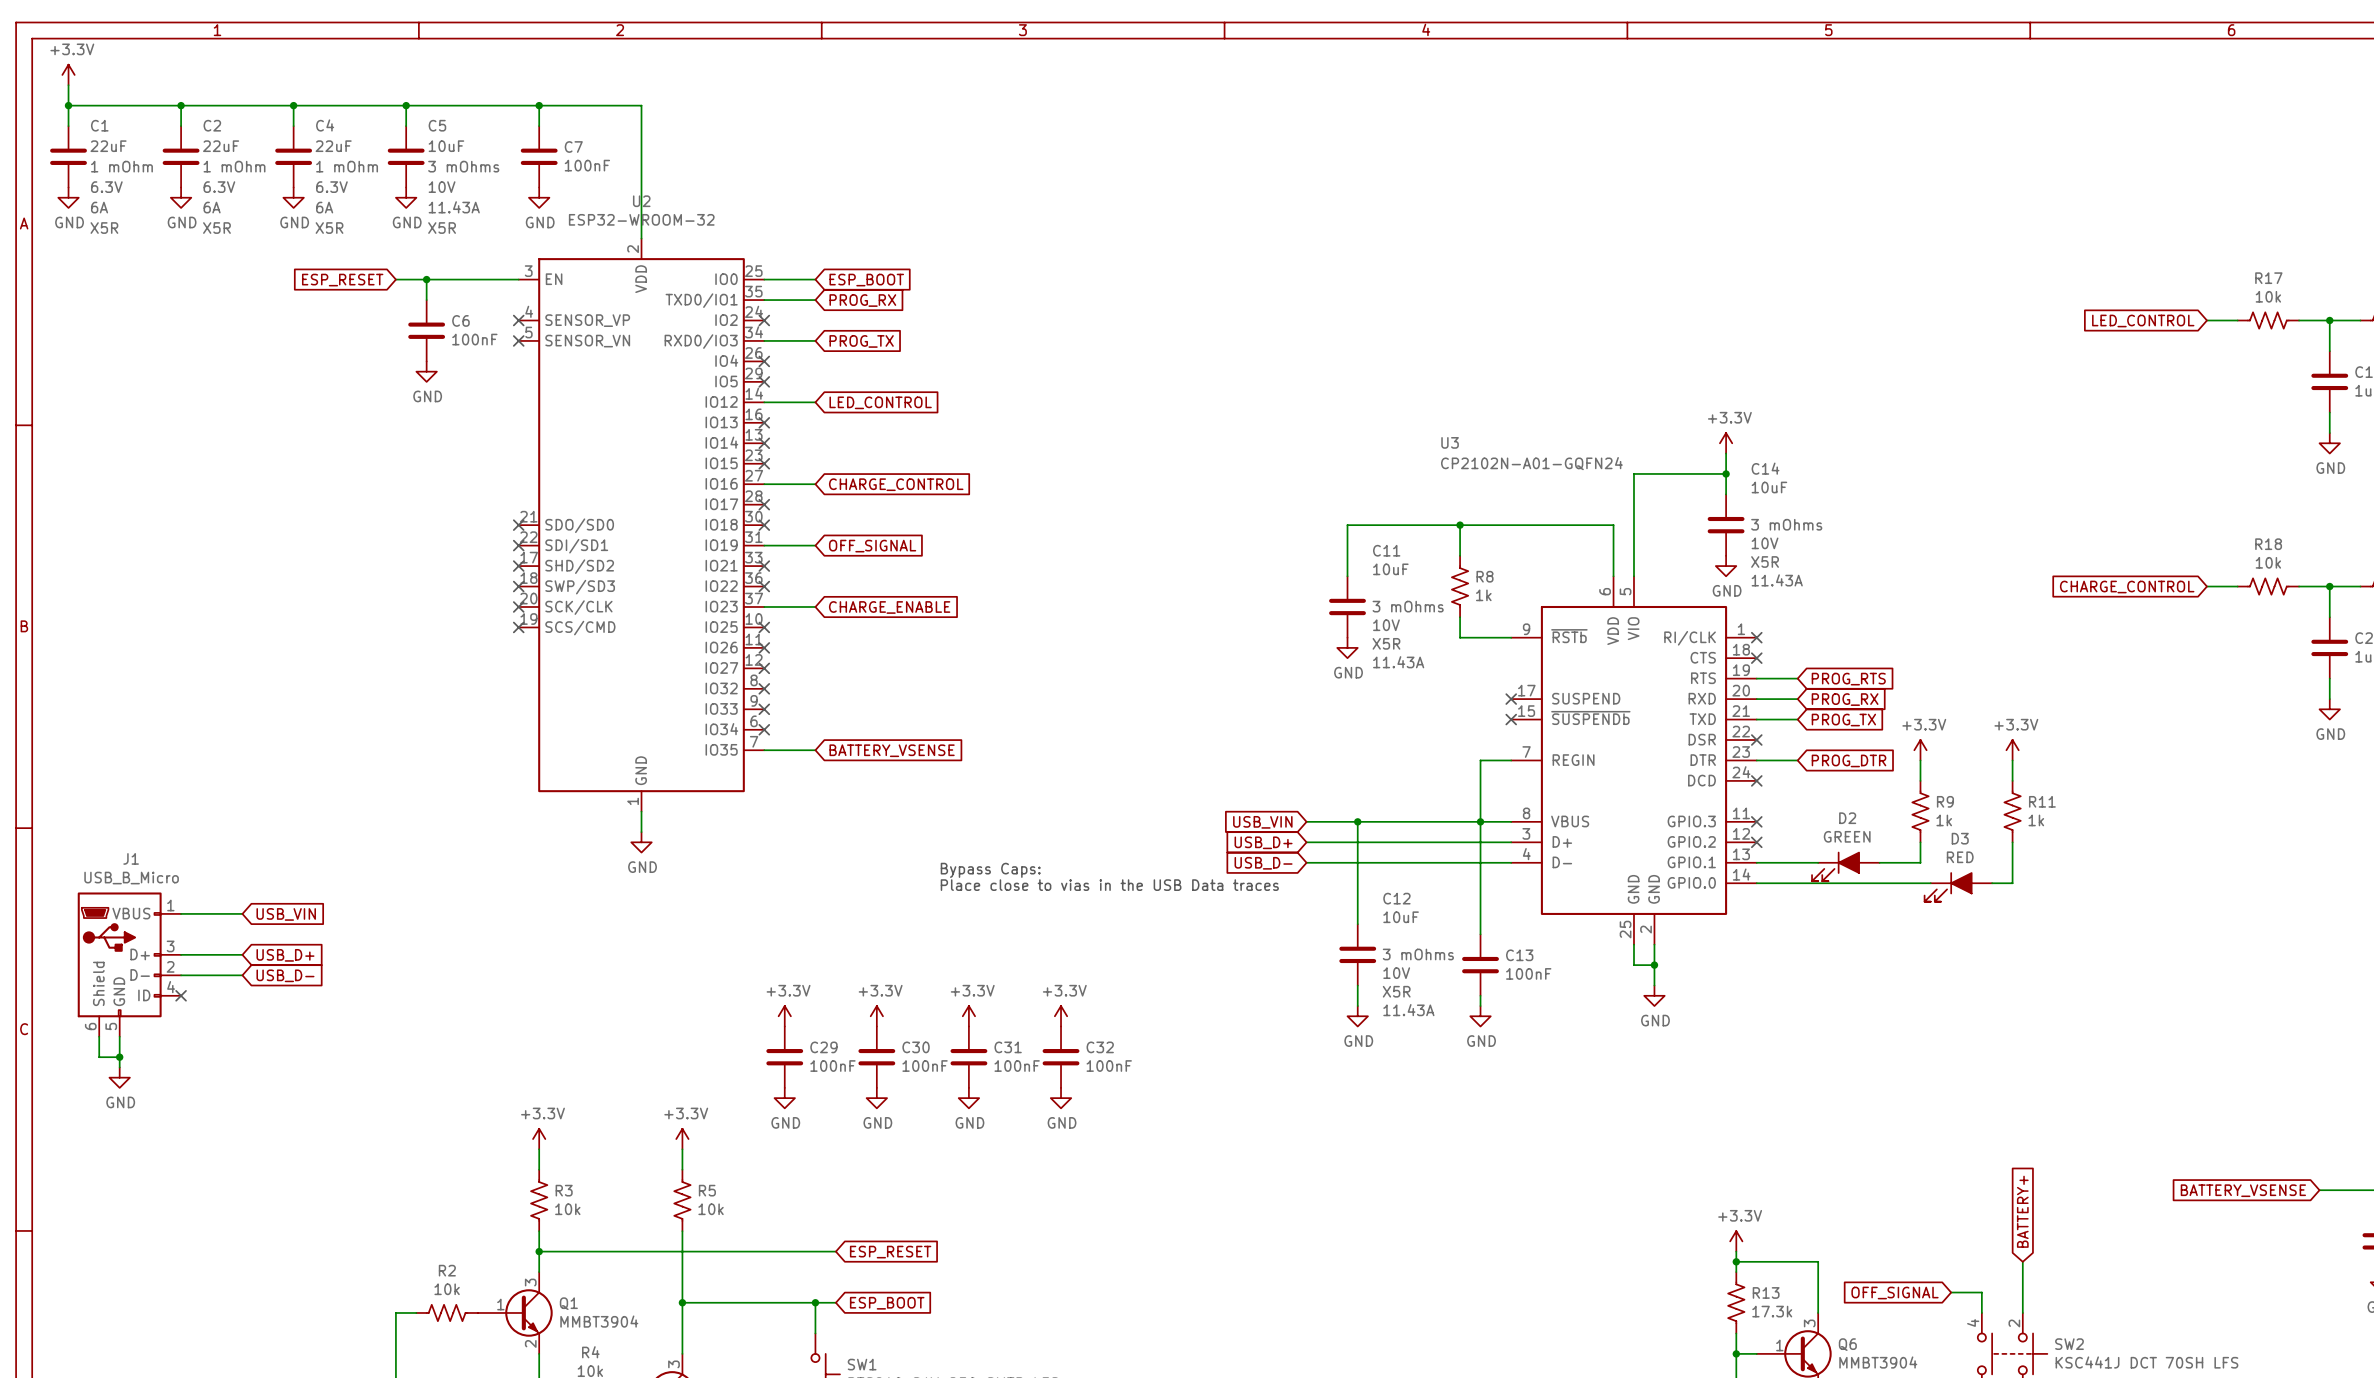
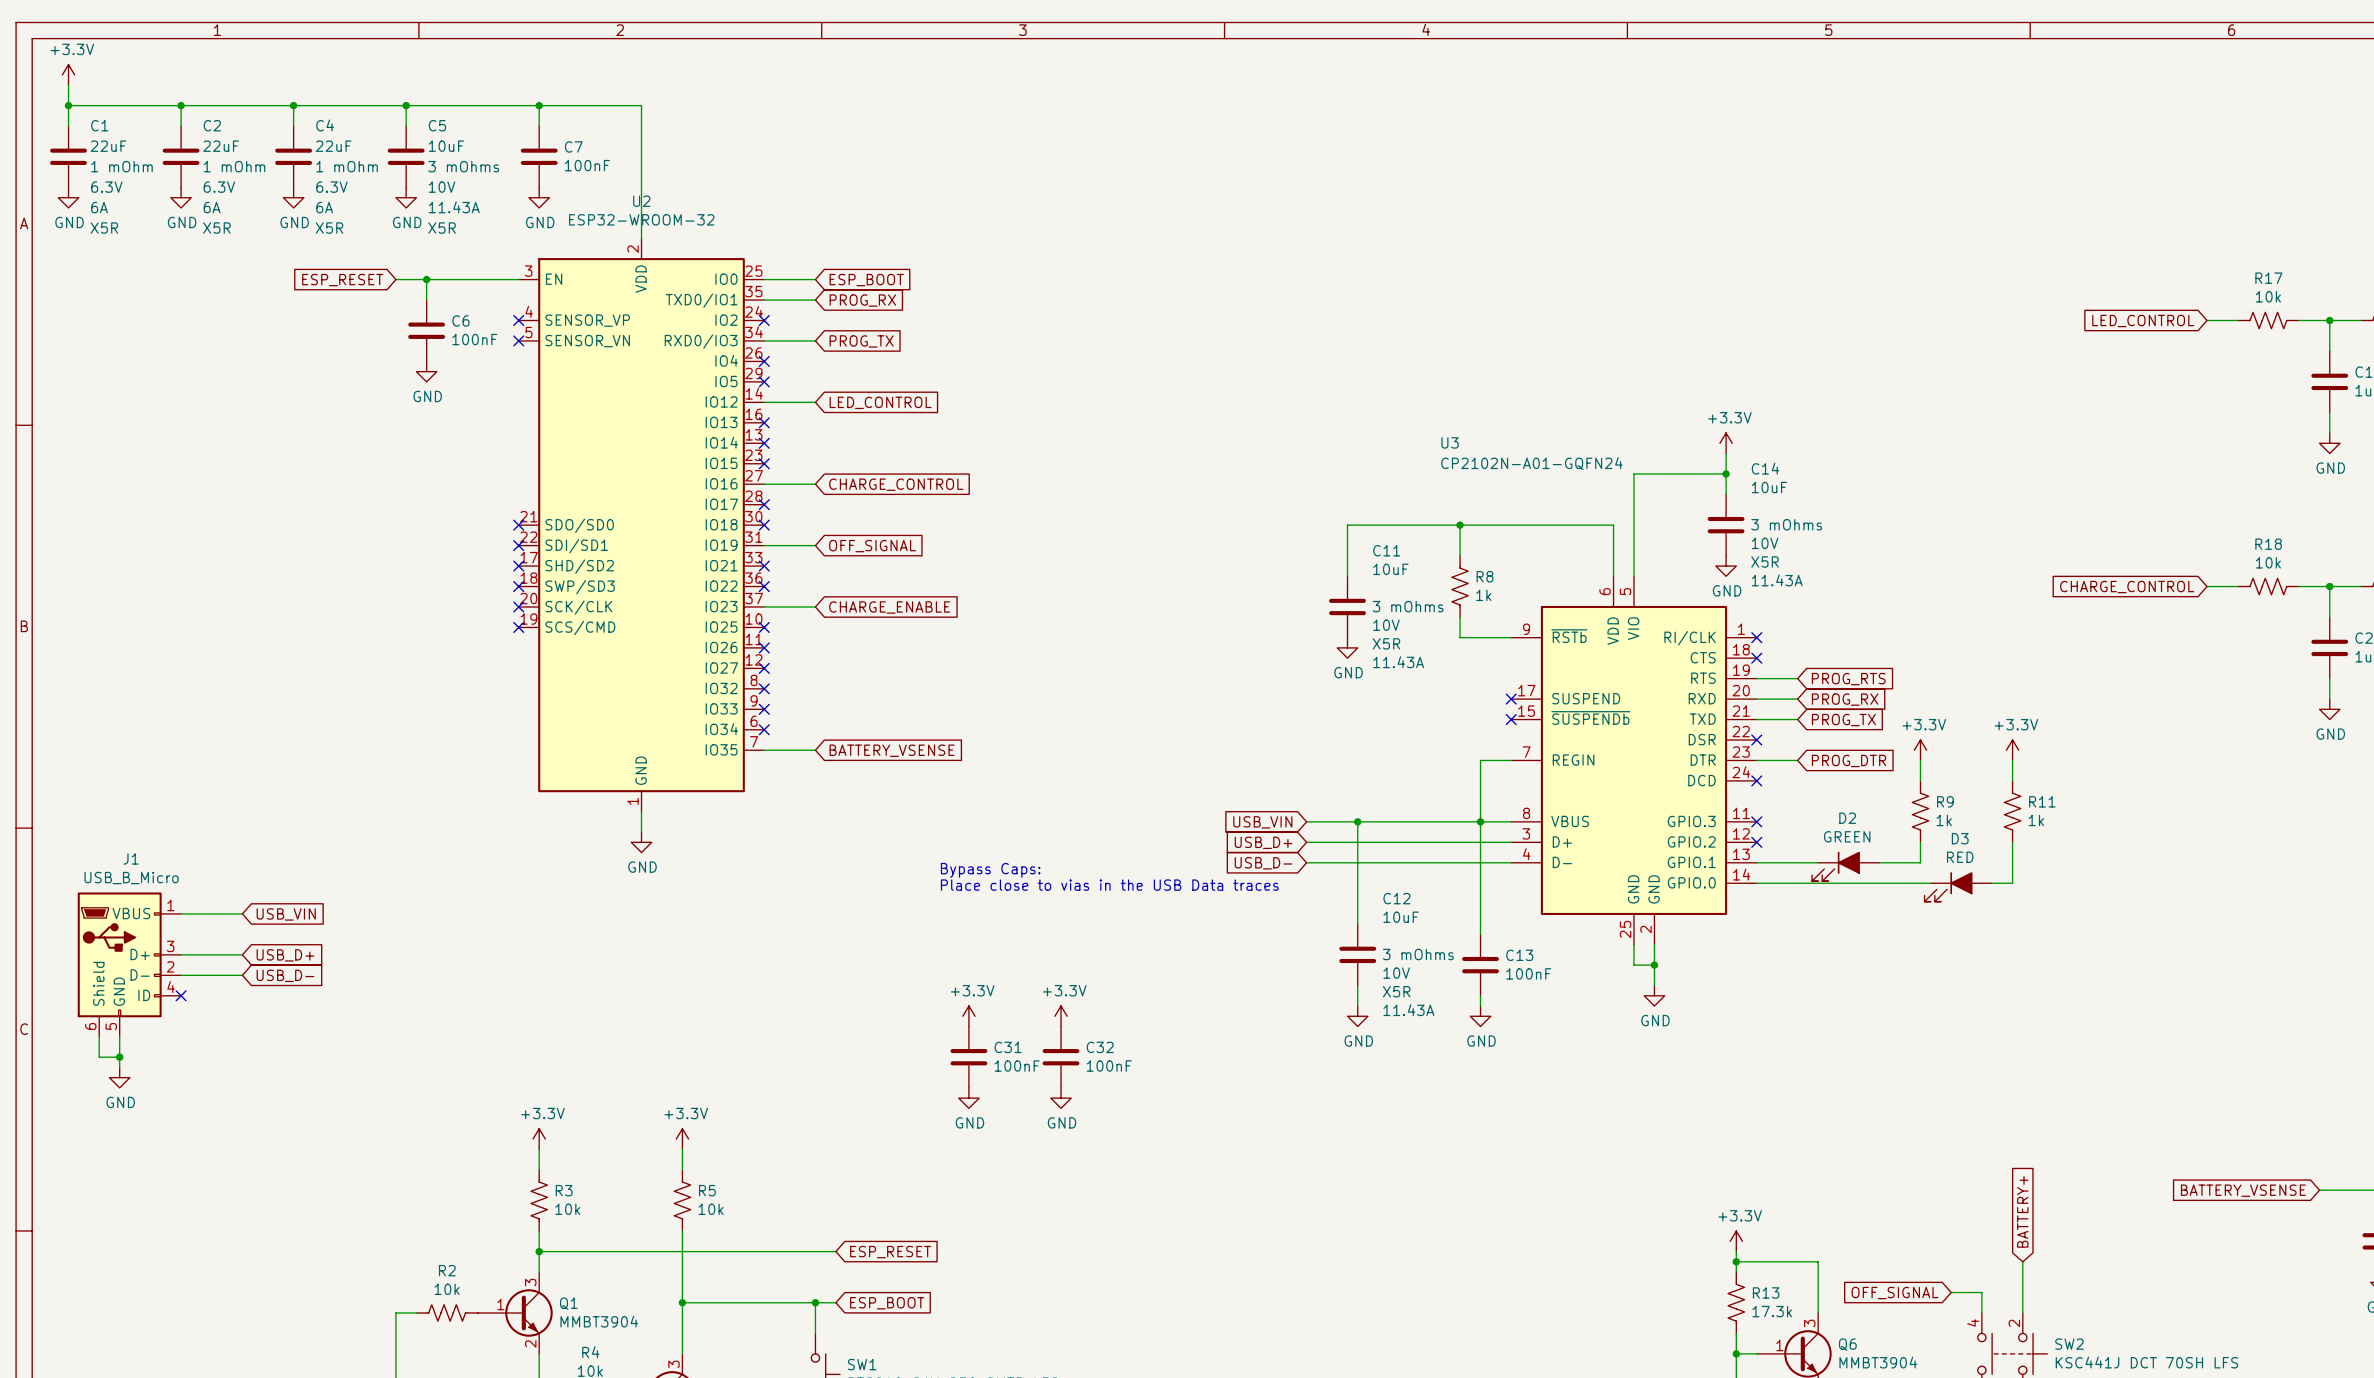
power symbol: +3.3V (784, 1016) -> none
power symbol: +3.3V (876, 1016) -> none
C29: 100nF (784, 1057) -> none
C30: 100nF (876, 1057) -> none
power symbol: GND (784, 1098) -> none
power symbol: GND (876, 1098) -> none

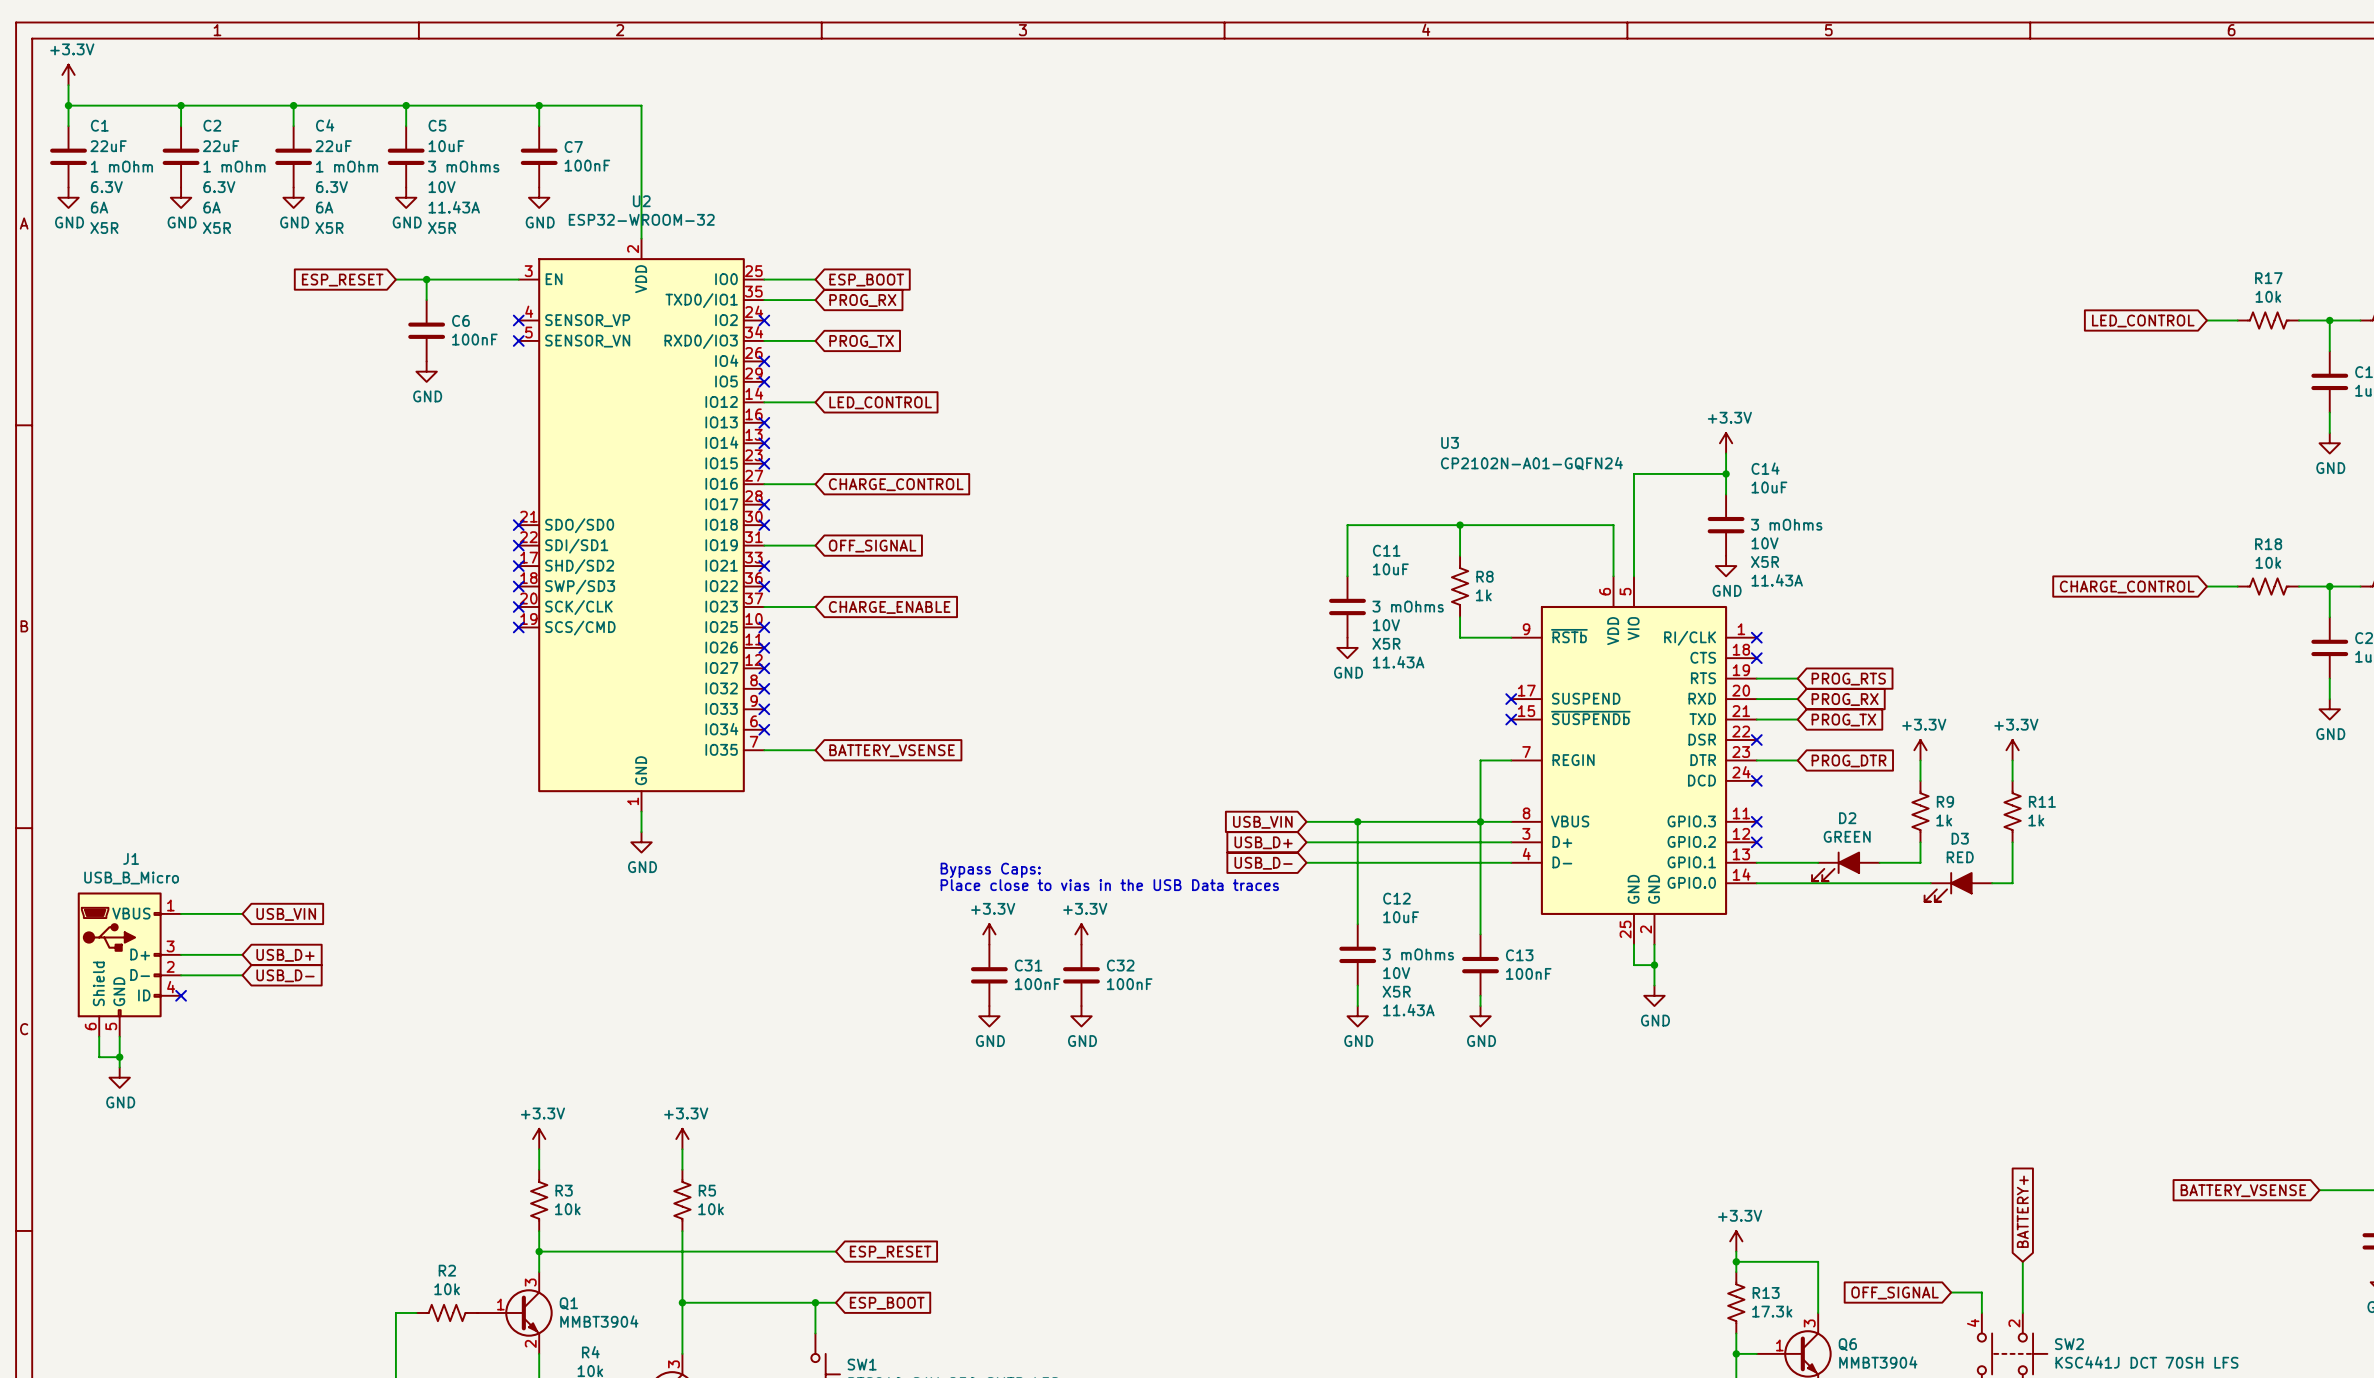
power symbol: none -> +3.3V (989, 934)
power symbol: none -> +3.3V (1081, 934)
power symbol: +3.3V (968, 1016) -> none
power symbol: none -> GND (989, 1016)
power symbol: +3.3V (1061, 1016) -> none
power symbol: none -> GND (1081, 1016)
C31 position: (968, 1057) -> (989, 975)
C32 position: (1061, 1057) -> (1081, 975)
power symbol: GND (968, 1098) -> none
power symbol: GND (1061, 1098) -> none

